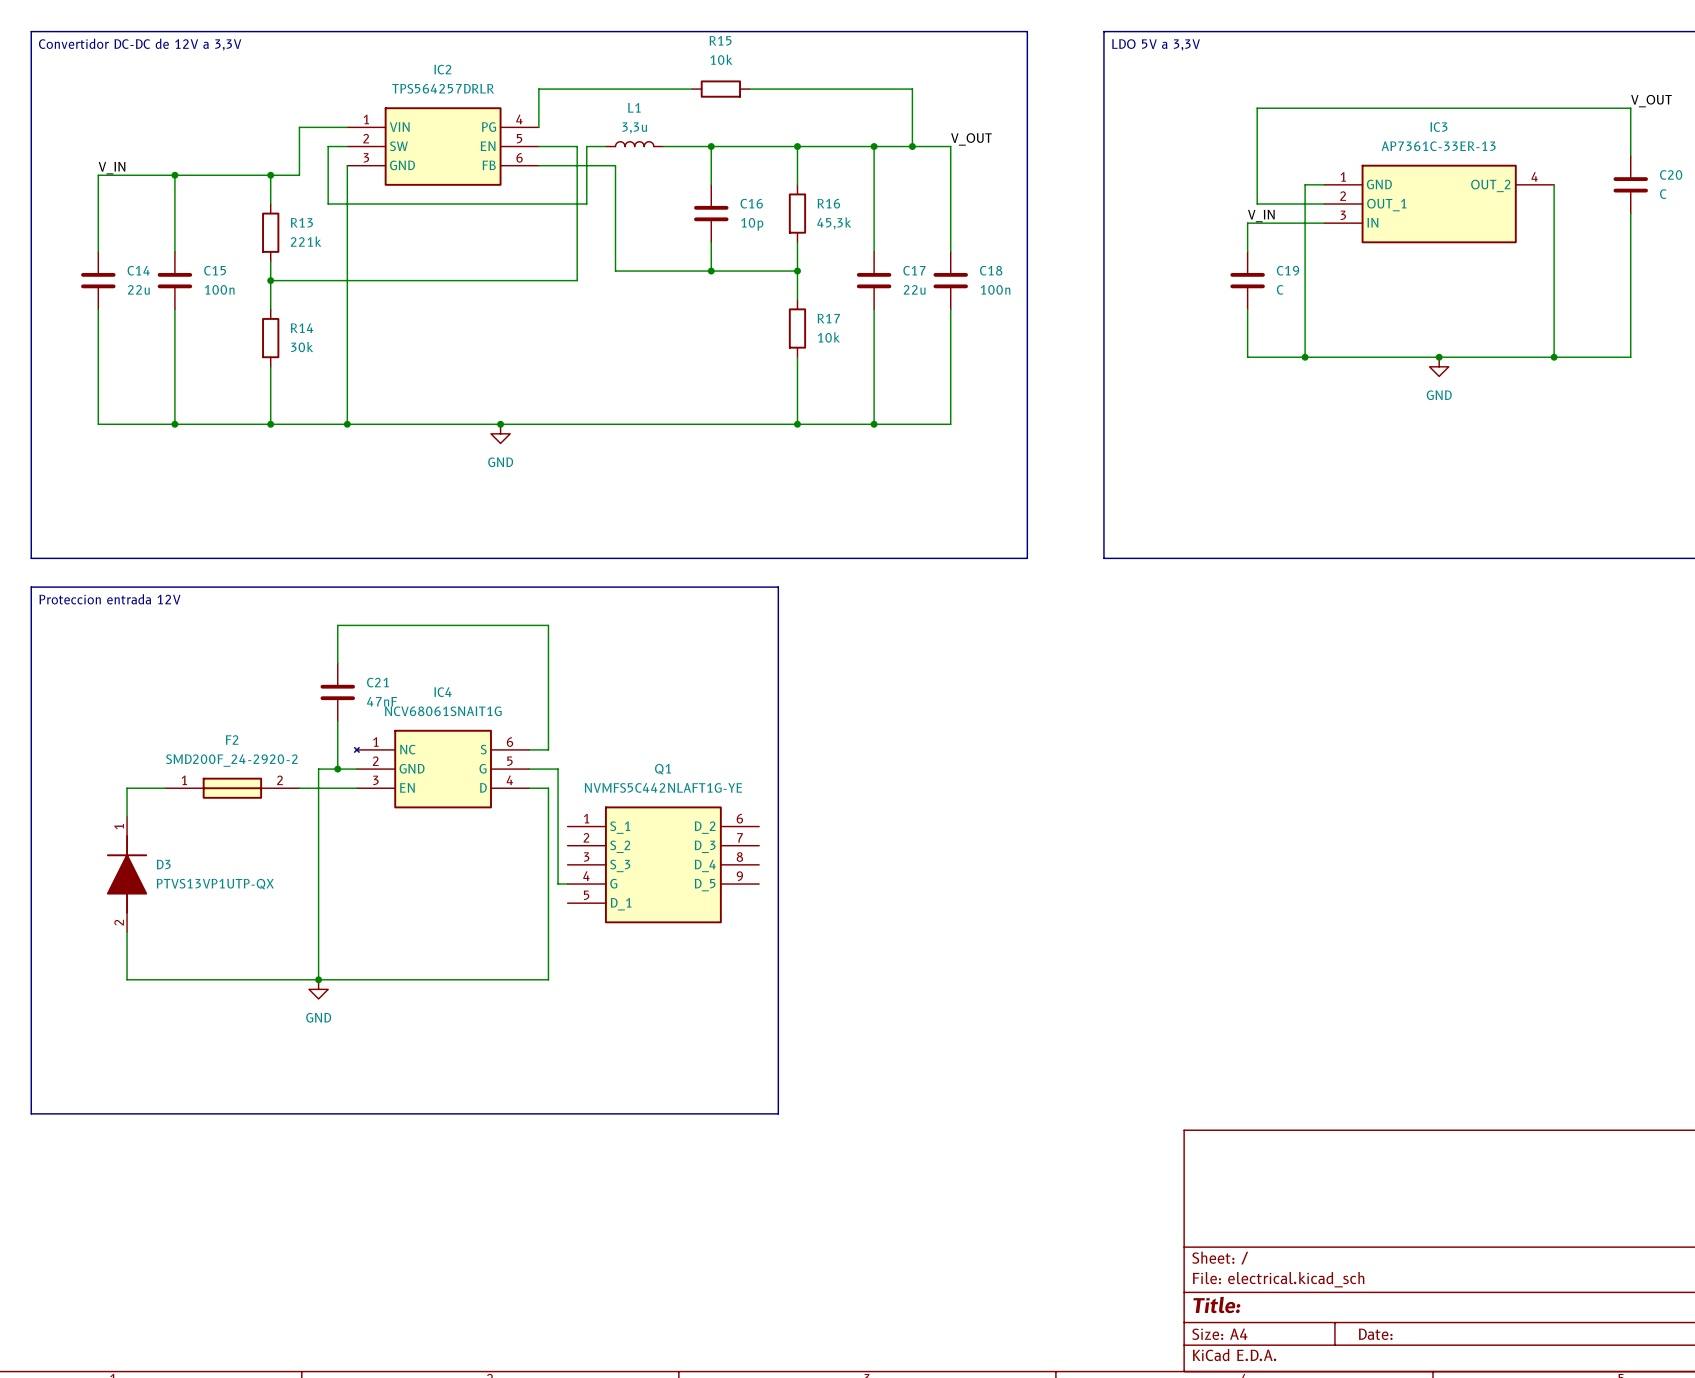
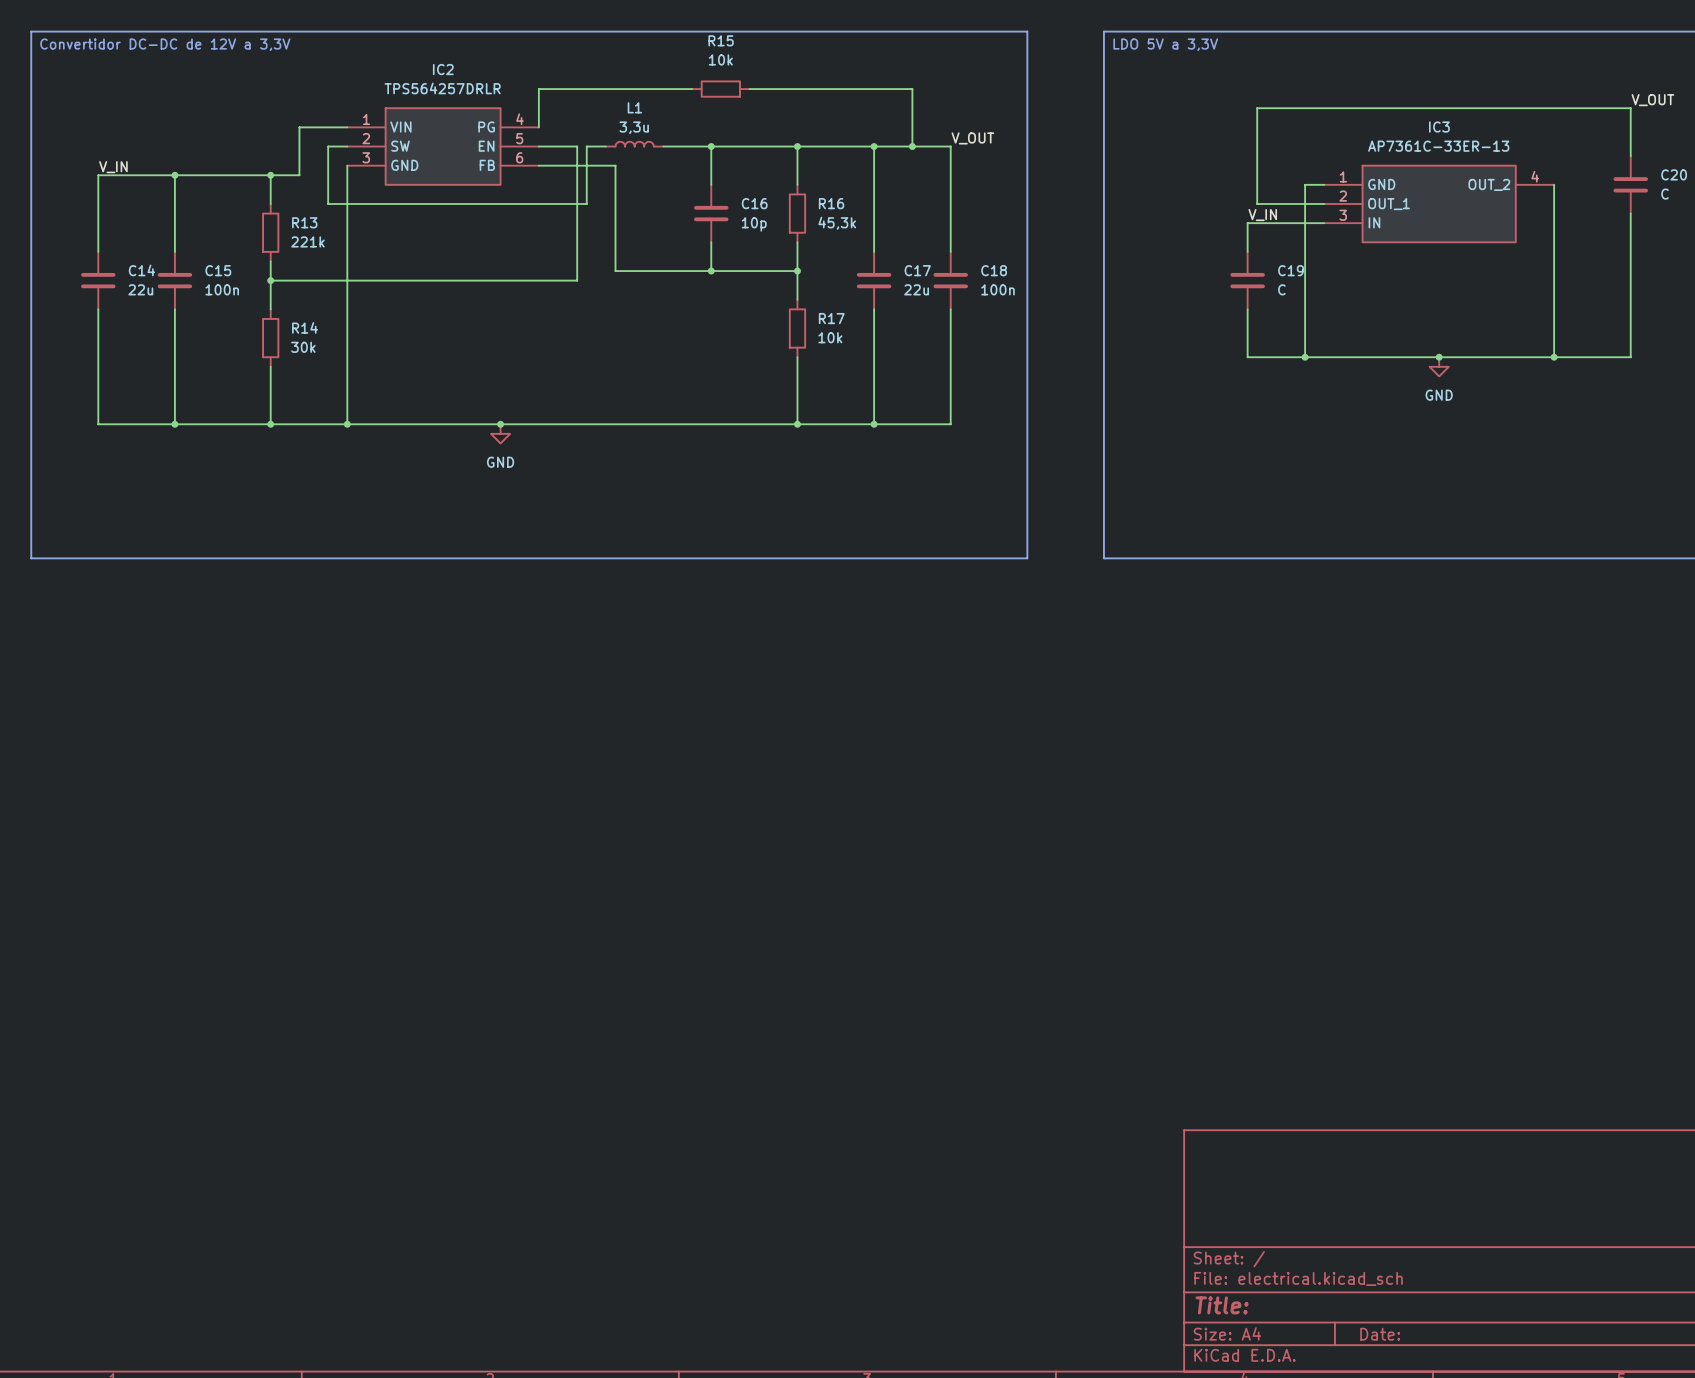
line: (31, 587) (778, 587) (778, 1113) (31, 1113) (31, 587) -> none
text: Proteccion entrada 12V (109, 599) -> none
wire: (337, 663) (337, 625) (548, 625) (548, 749) (529, 749) -> none
C21: 47nF (337, 692) -> none
wire: (337, 721) (337, 769) -> none
junction: (337, 769) -> none
wire: (356, 769) (318, 769) (318, 979) -> none
IC4: NCV68061SNAIT1G (441, 769) -> none
wire: (529, 769) (558, 769) (558, 884) (567, 884) -> none
wire: (165, 788) (127, 788) (127, 816) -> none
F2: SMD200F_24-2920-2 (232, 788) -> none
wire: (299, 788) (356, 788) -> none
wire: (529, 788) (548, 788) (548, 979) (127, 979) (127, 931) -> none
Q1: NVMFS5C442NLAFT1G-YE (663, 864) -> none
D3: PTVS13VP1UTP-QX (127, 874) -> none
junction: (318, 979) -> none
power symbol: GND (318, 989) -> none

